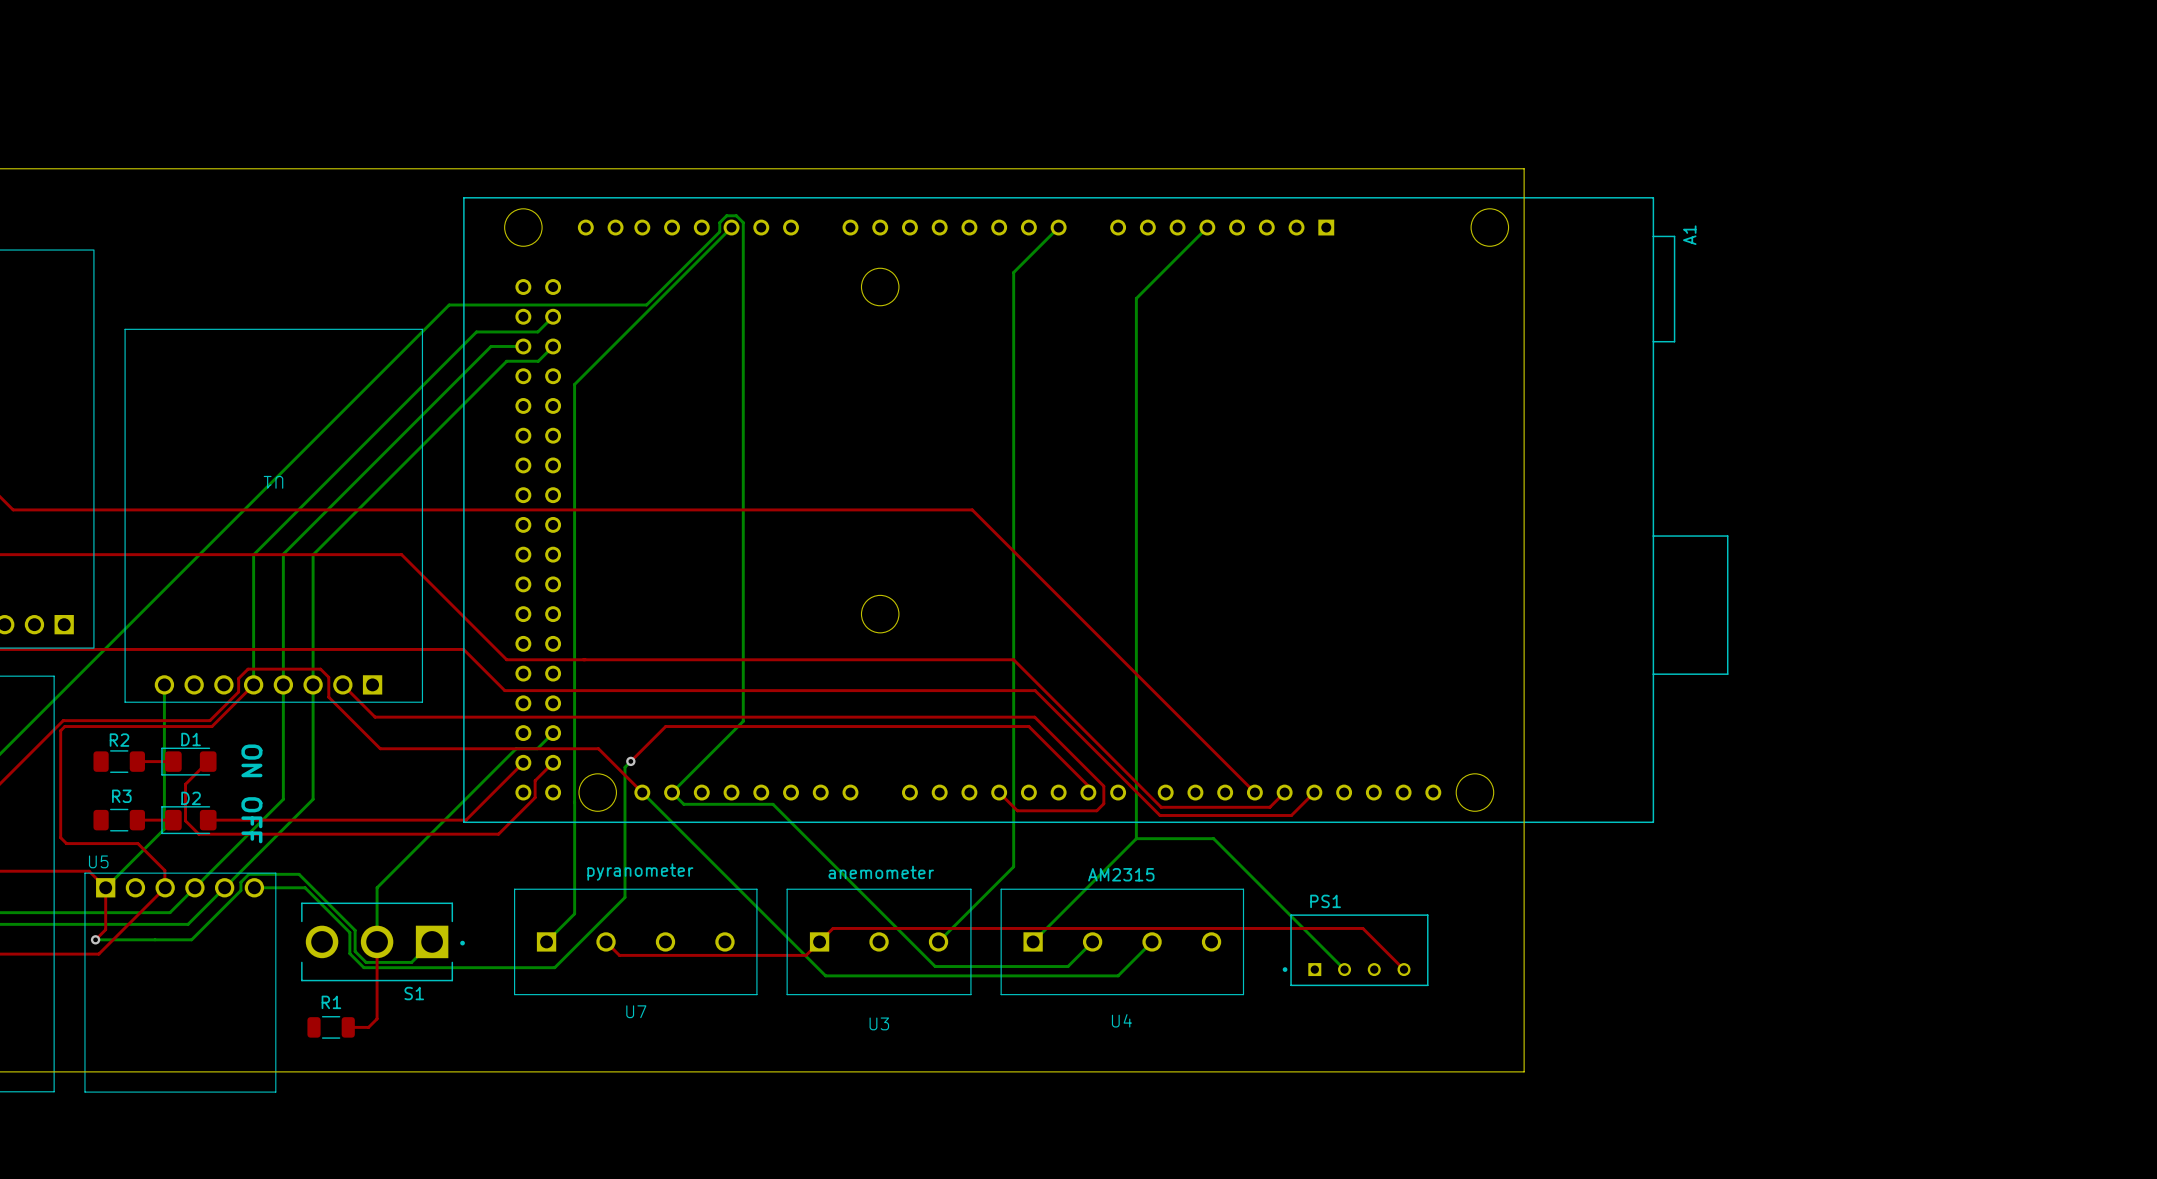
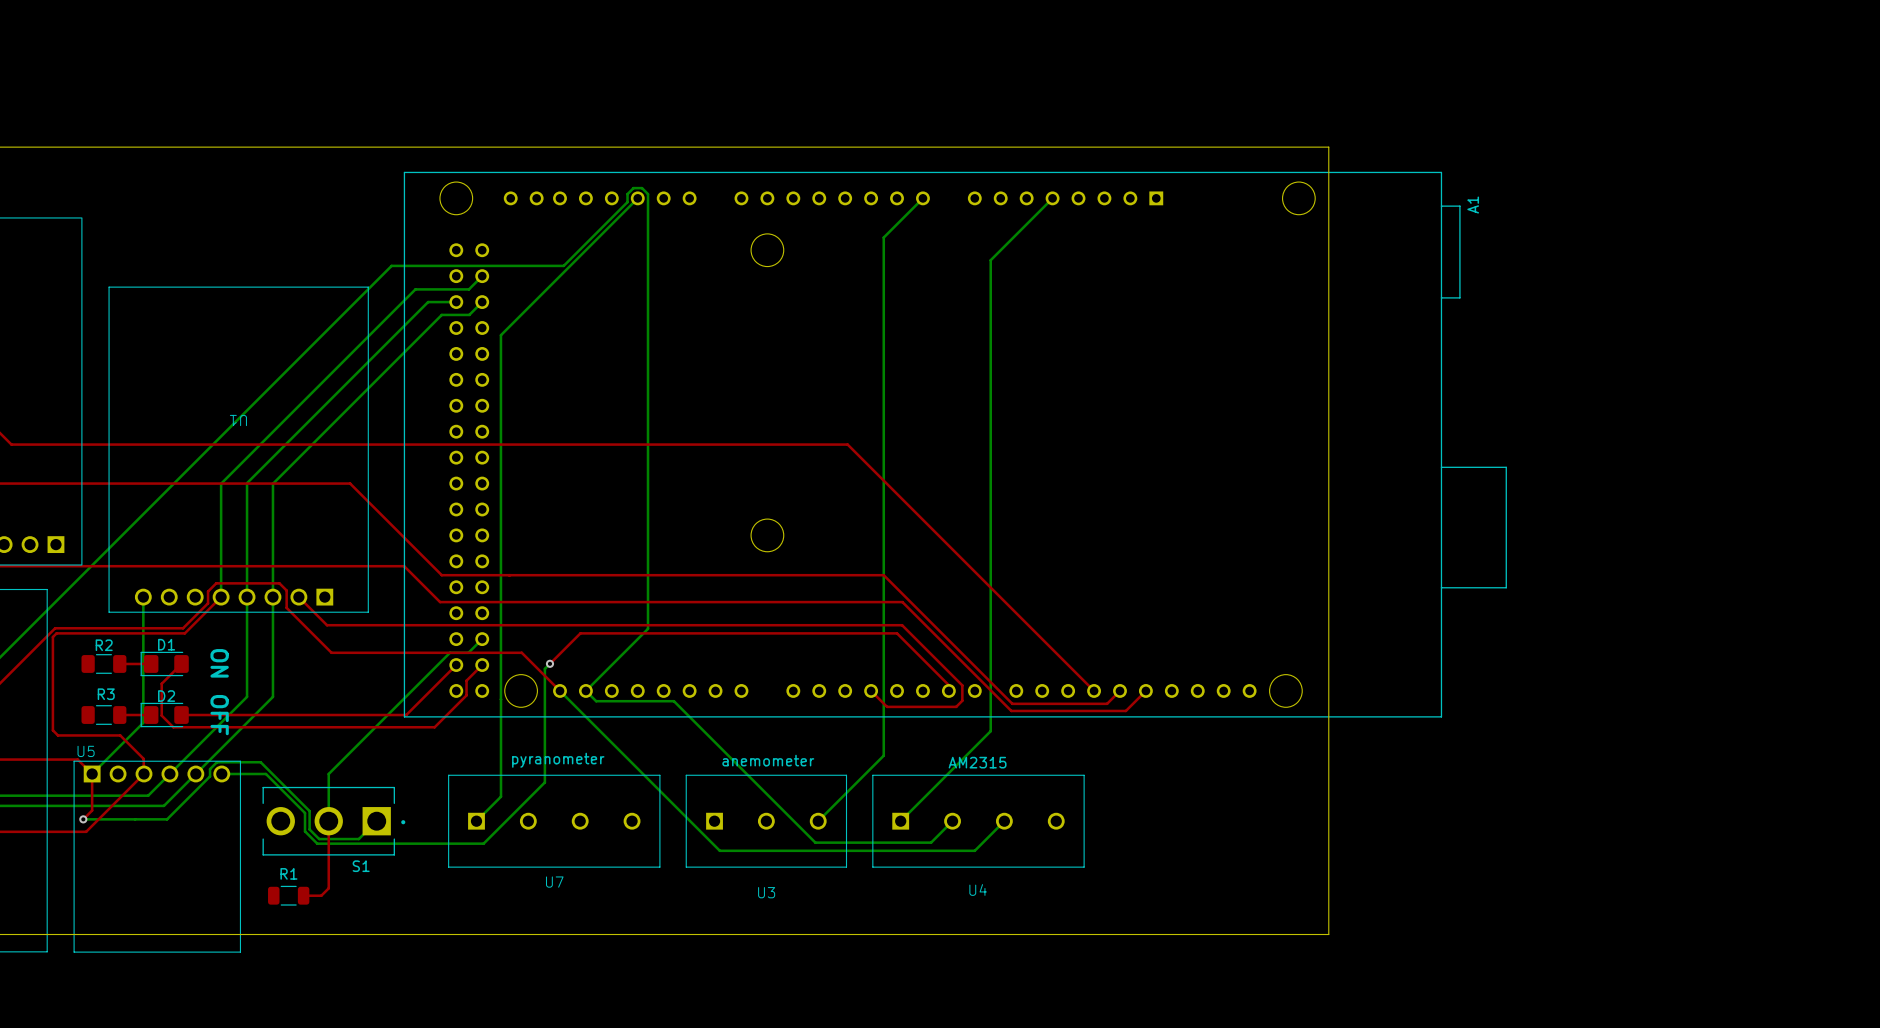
bottom track: (1136, 838) (1213, 838) (1344, 969) -> none
top track: (606, 941) (619, 955) (806, 955) (833, 928) (1362, 928) (1404, 969) -> none
PS1: (1355, 950) -> none

